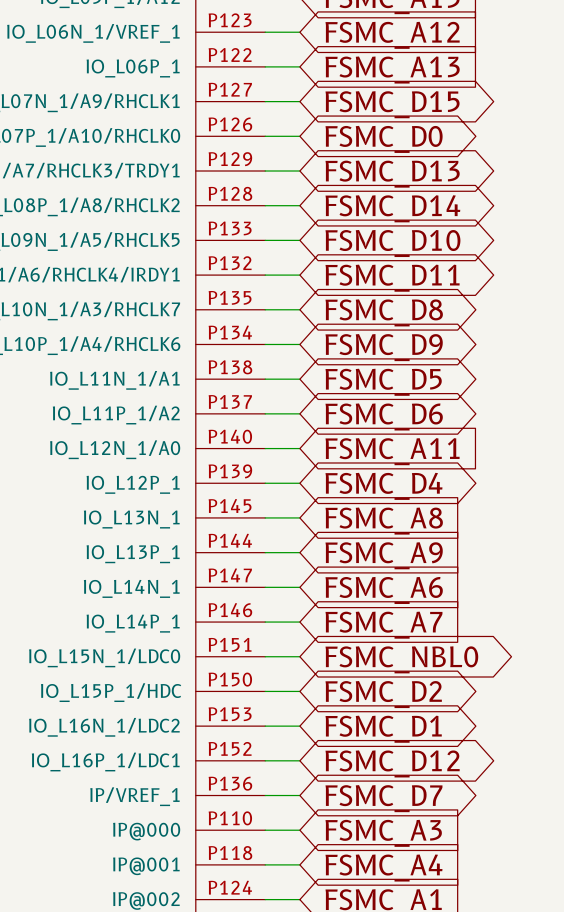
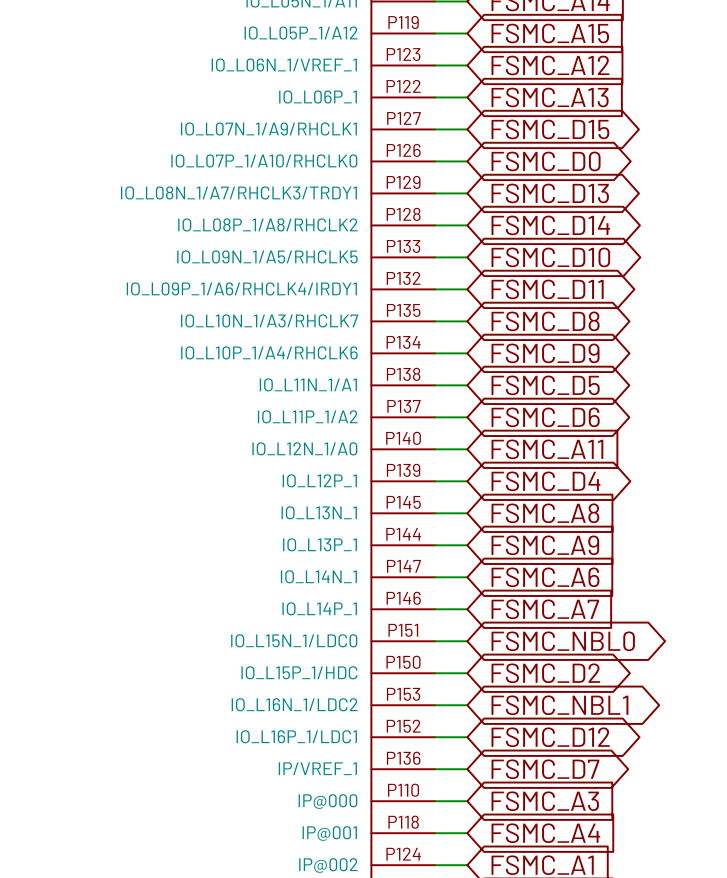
global label: FSMC_D1 (383, 729) -> FSMC_NBL1 (559, 705)

